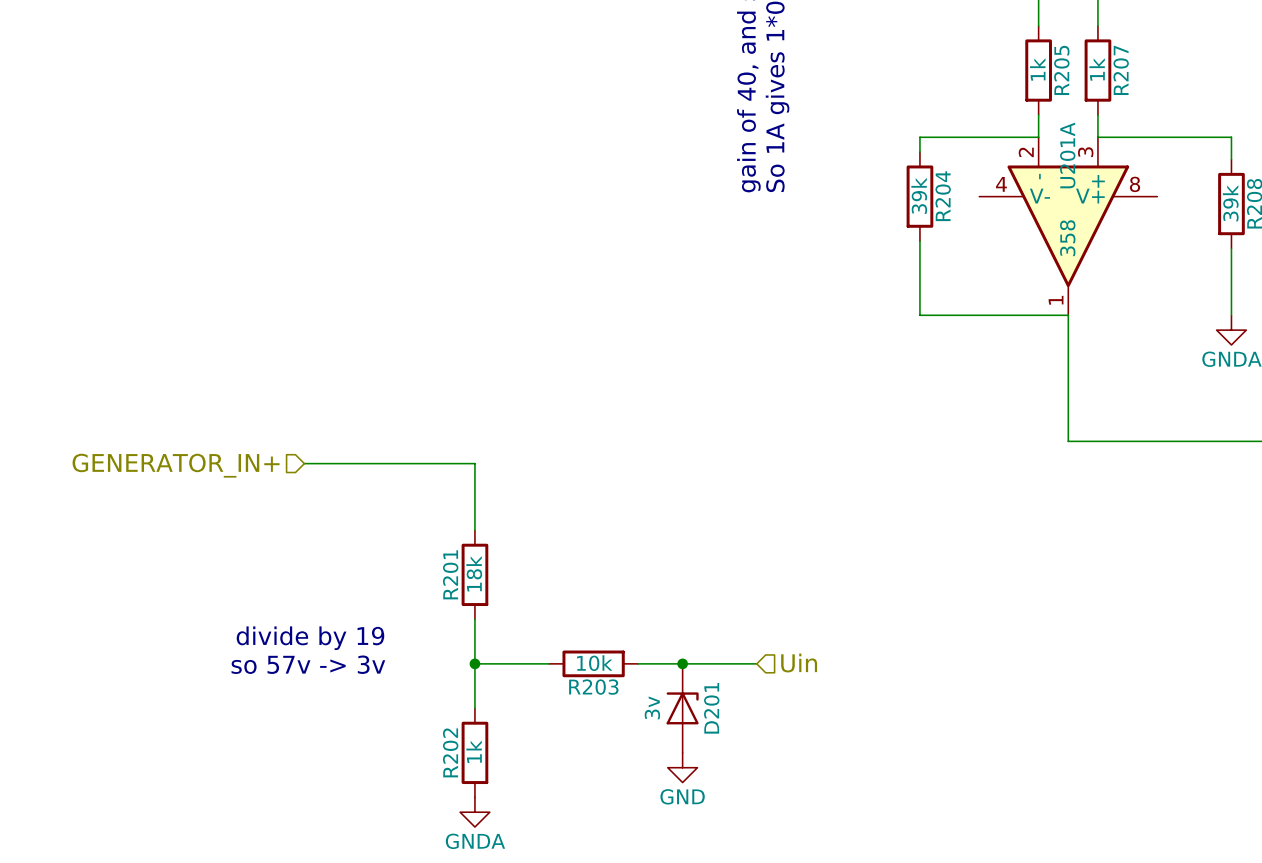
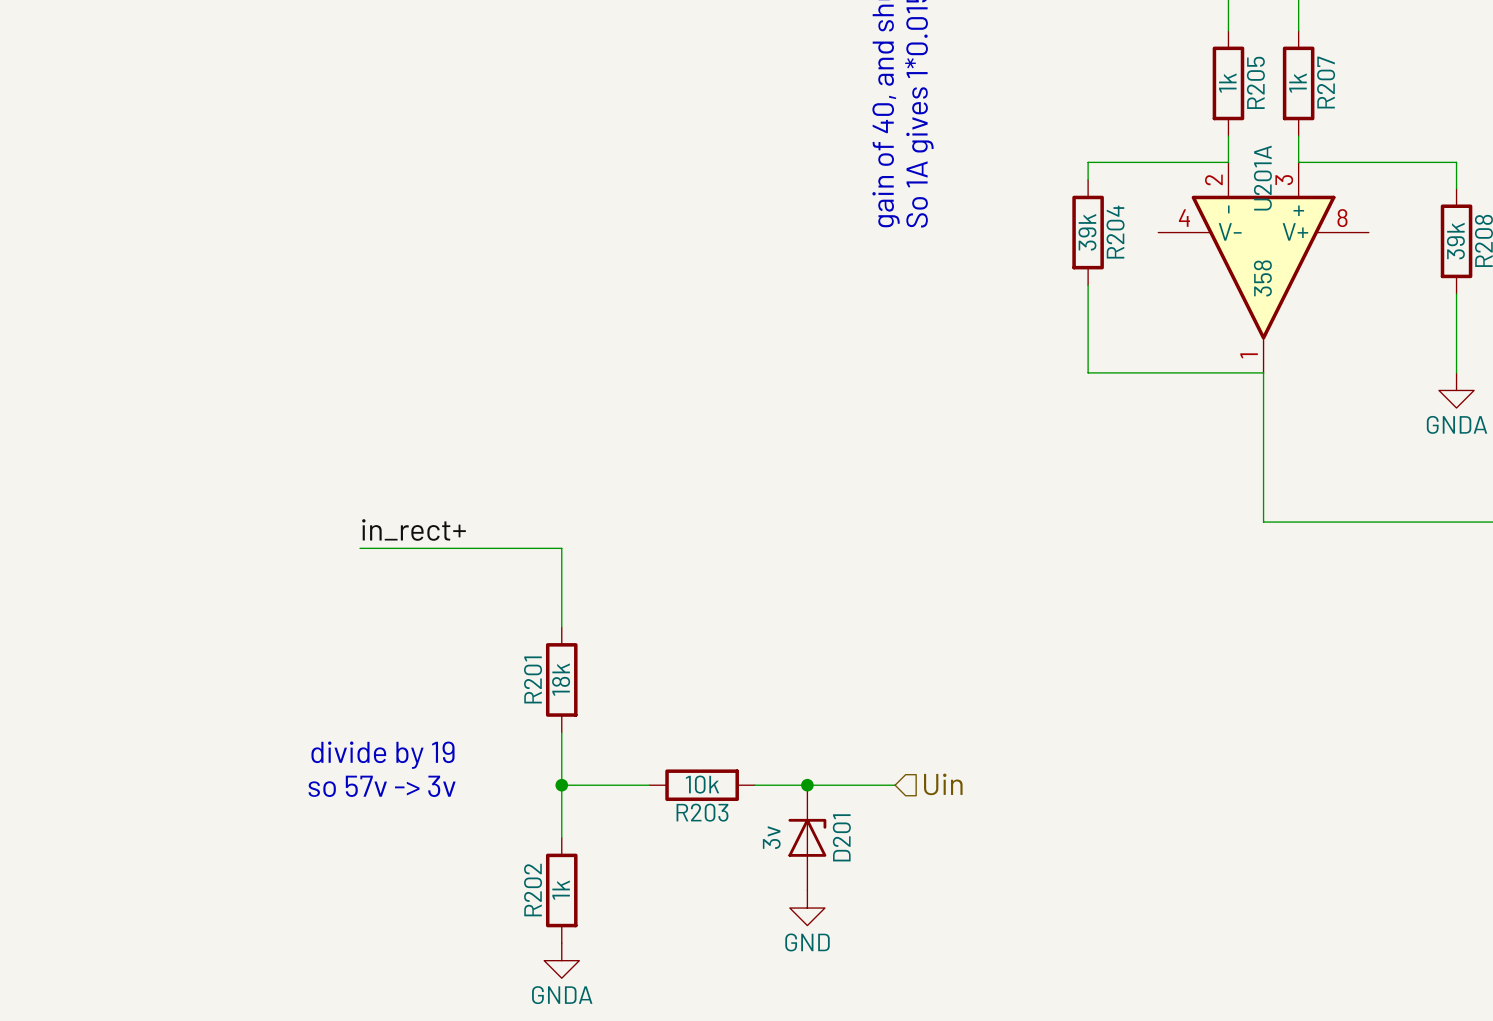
label: none -> in_rect+ (414, 529)
hierarchical label: GENERATOR_IN+ (176, 465) -> none

